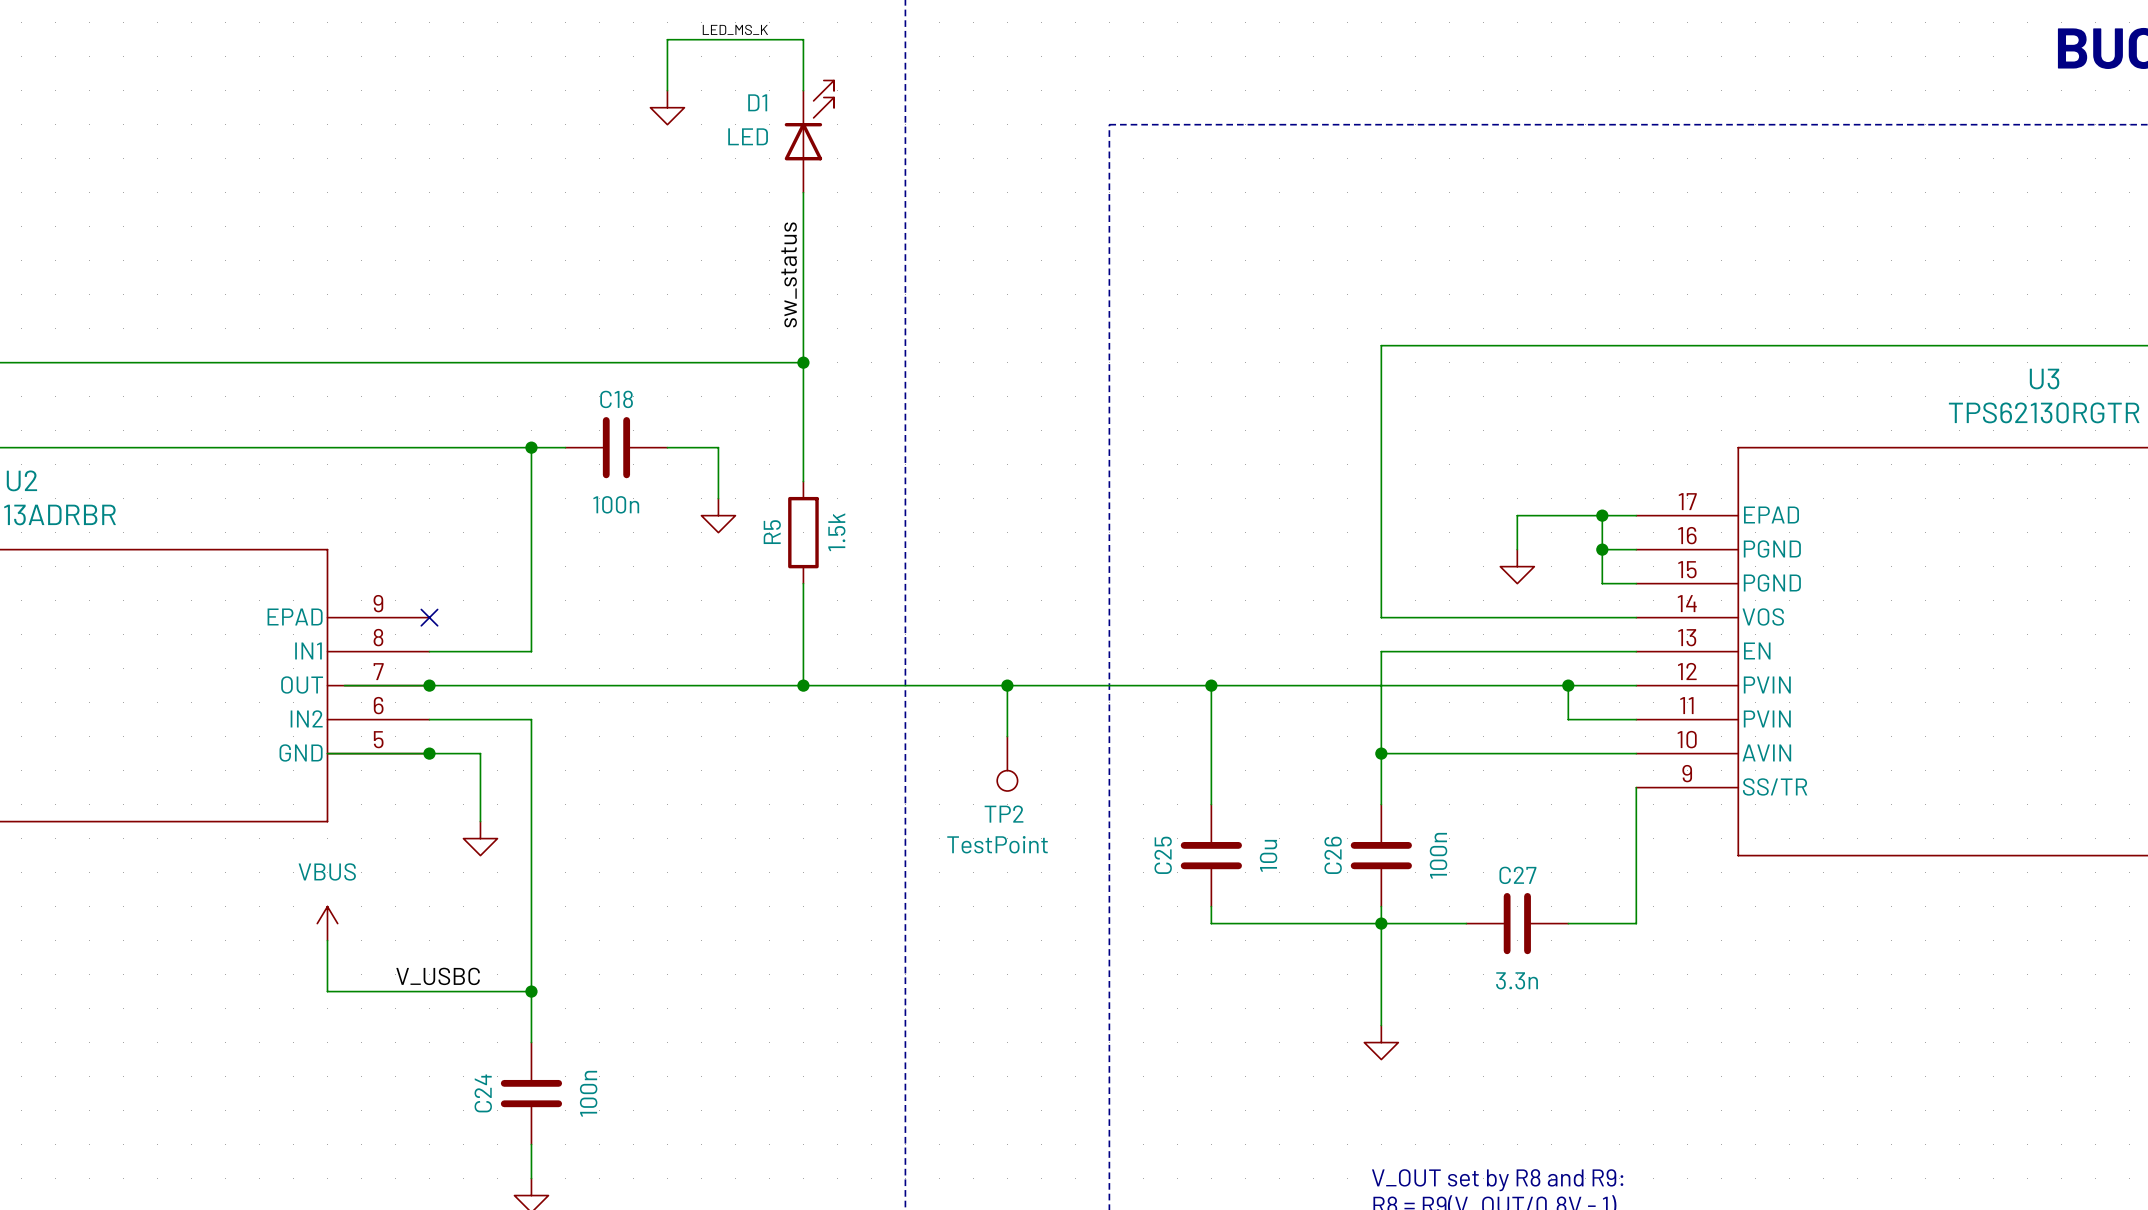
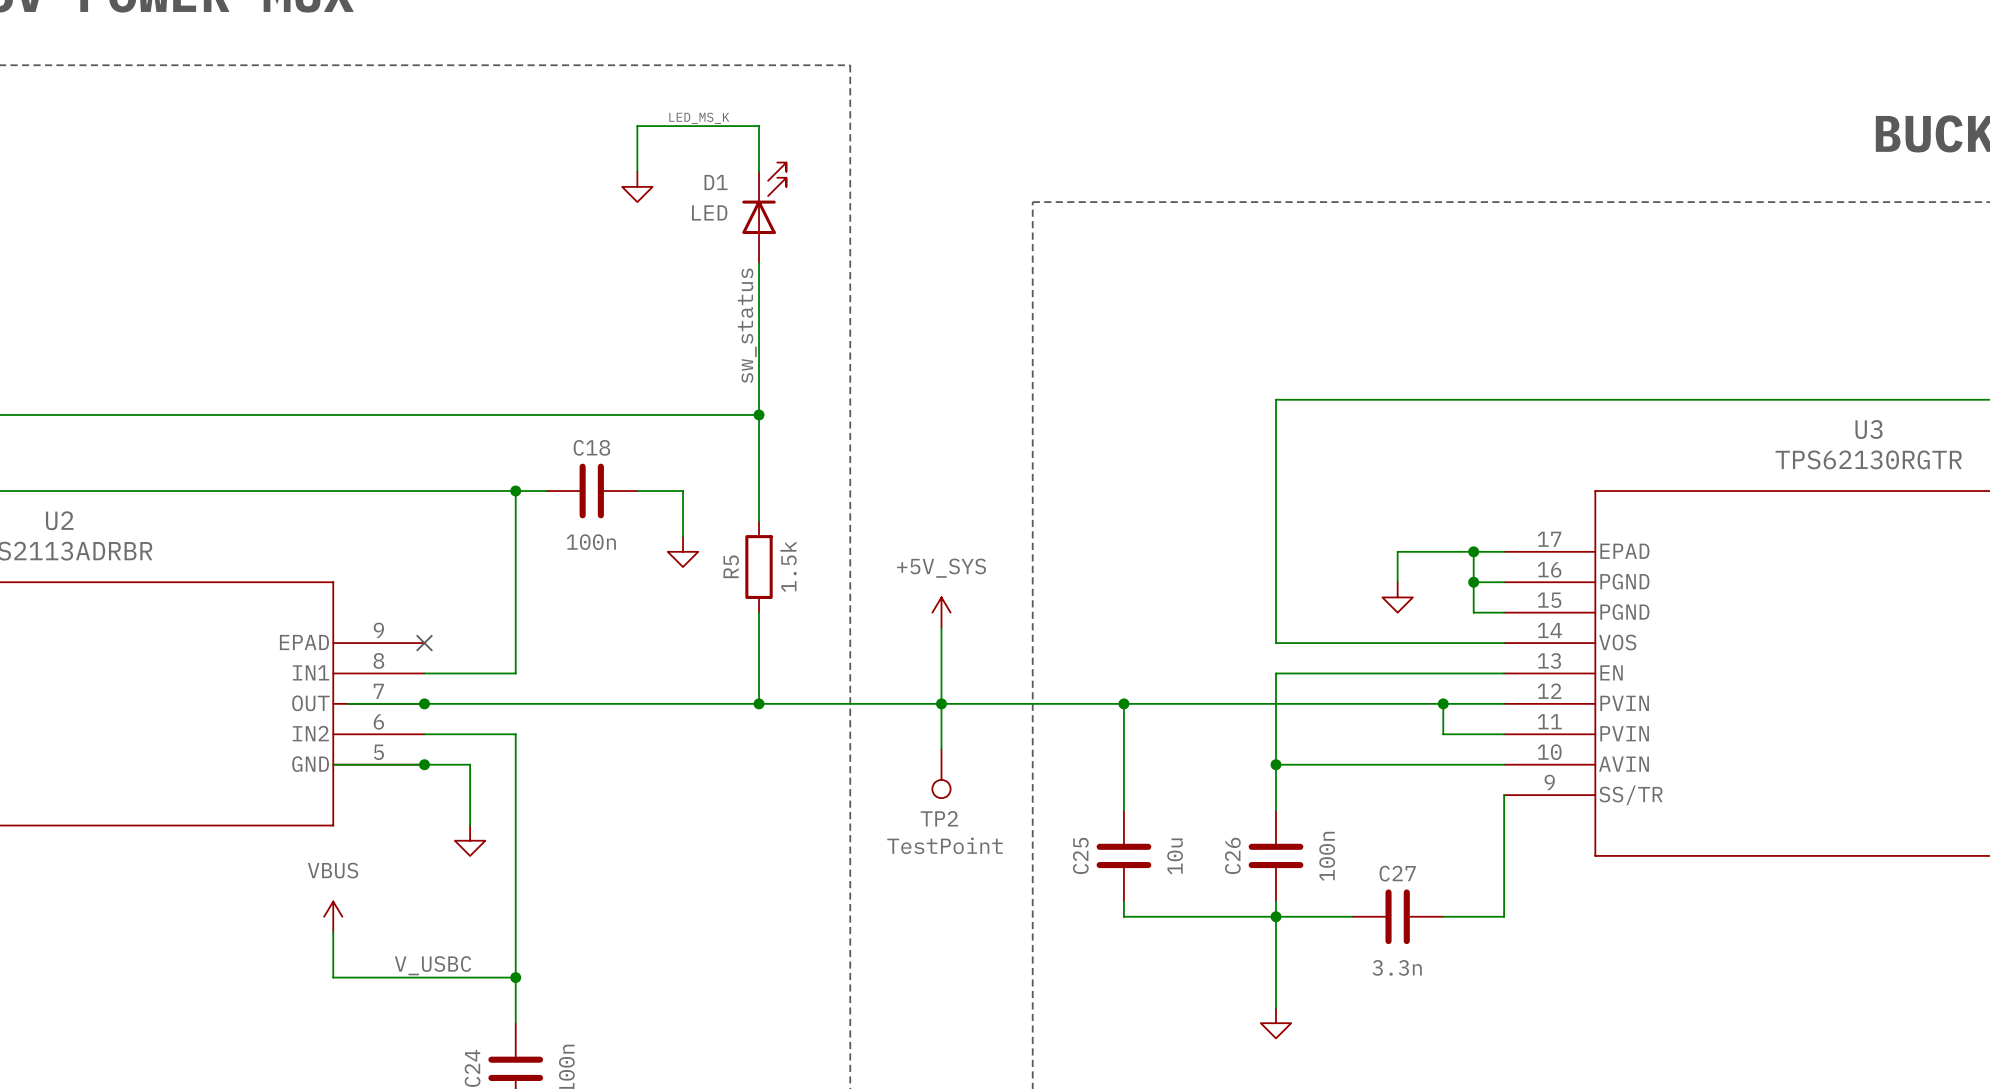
power symbol: none -> +5V_SYS (941, 612)
wire: none -> (941, 627) (941, 703)

